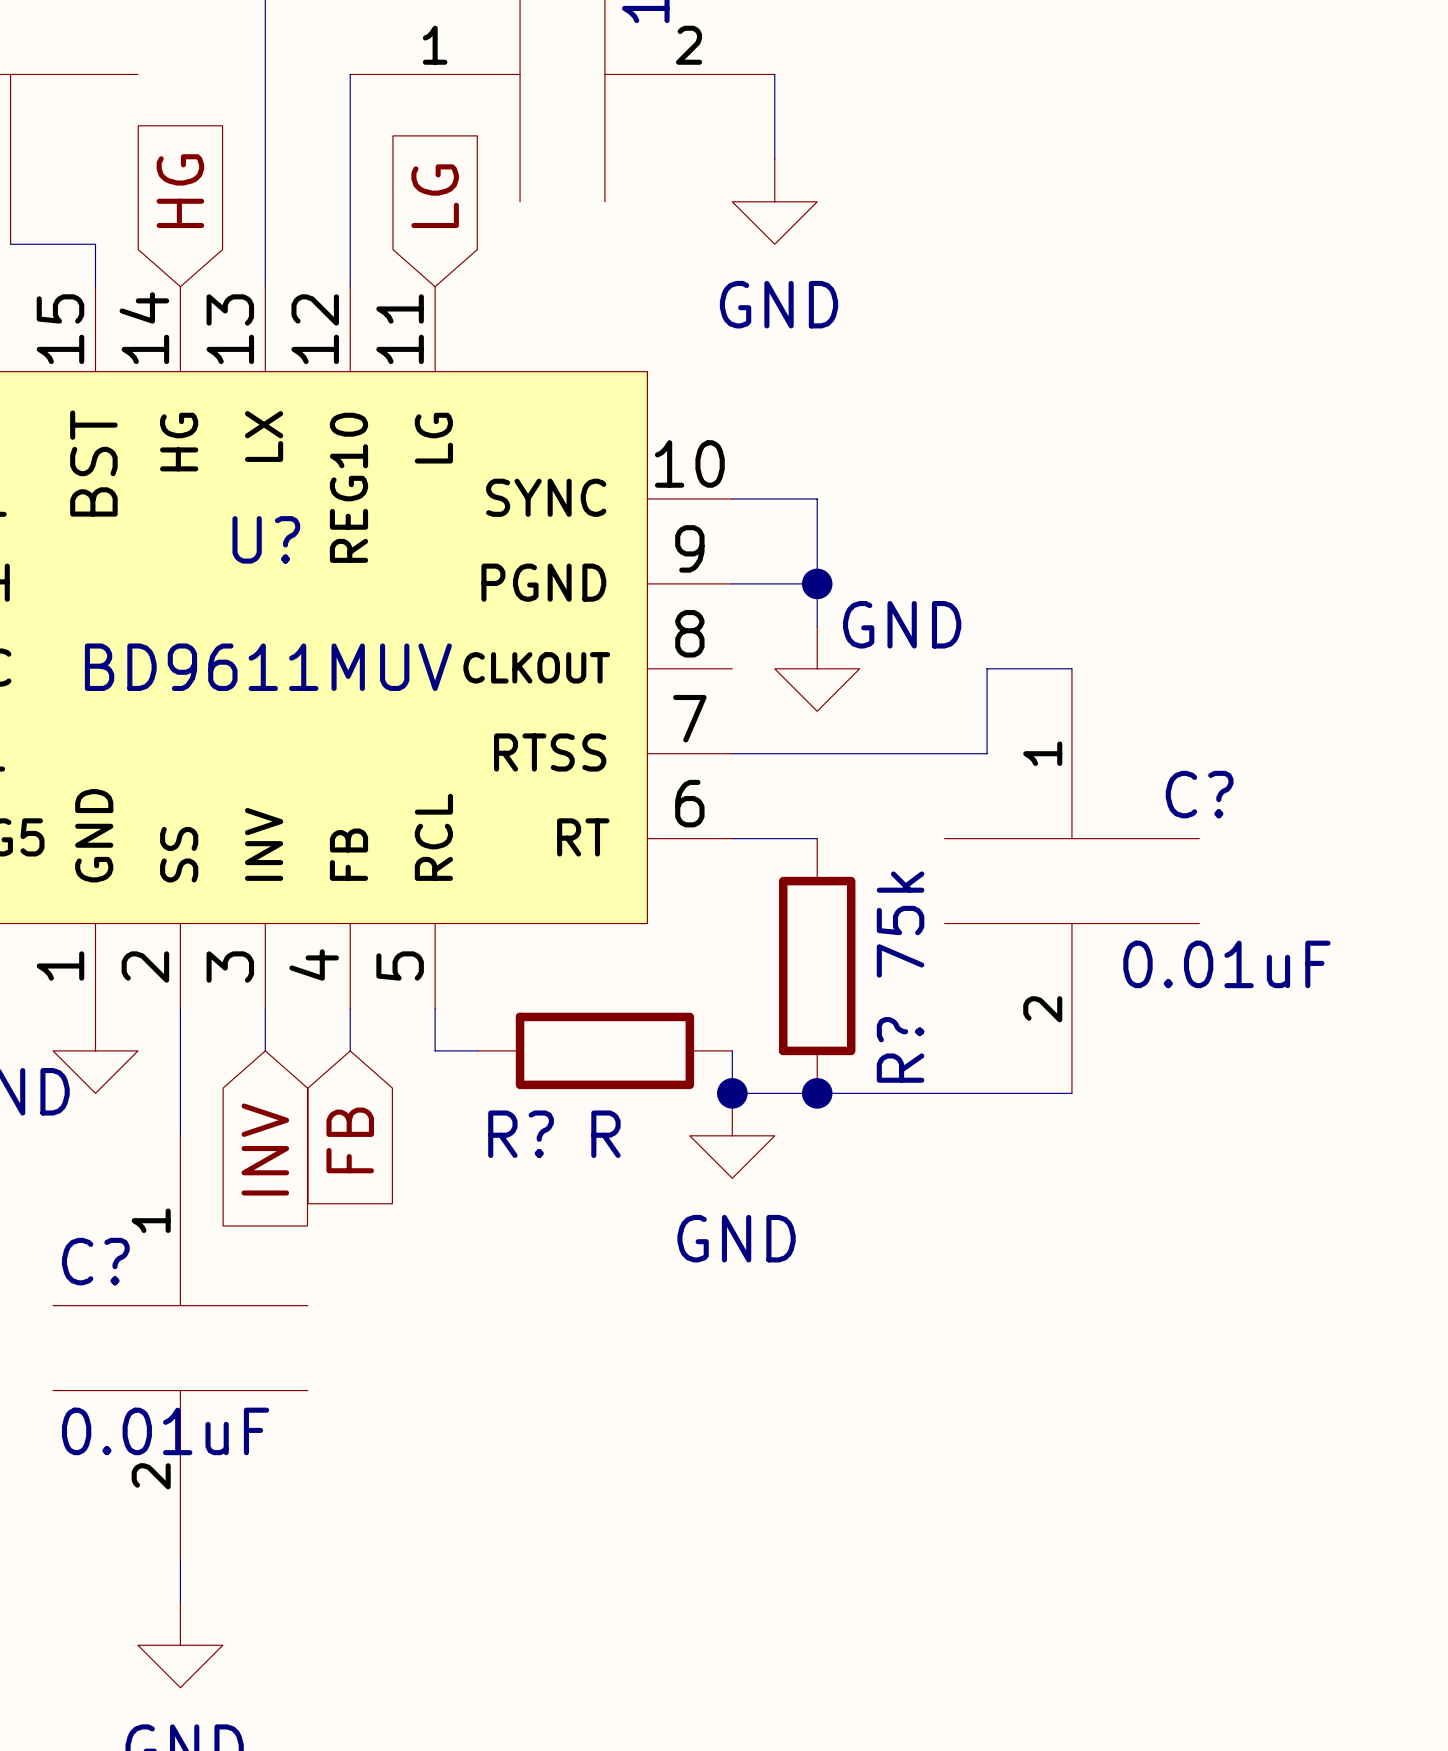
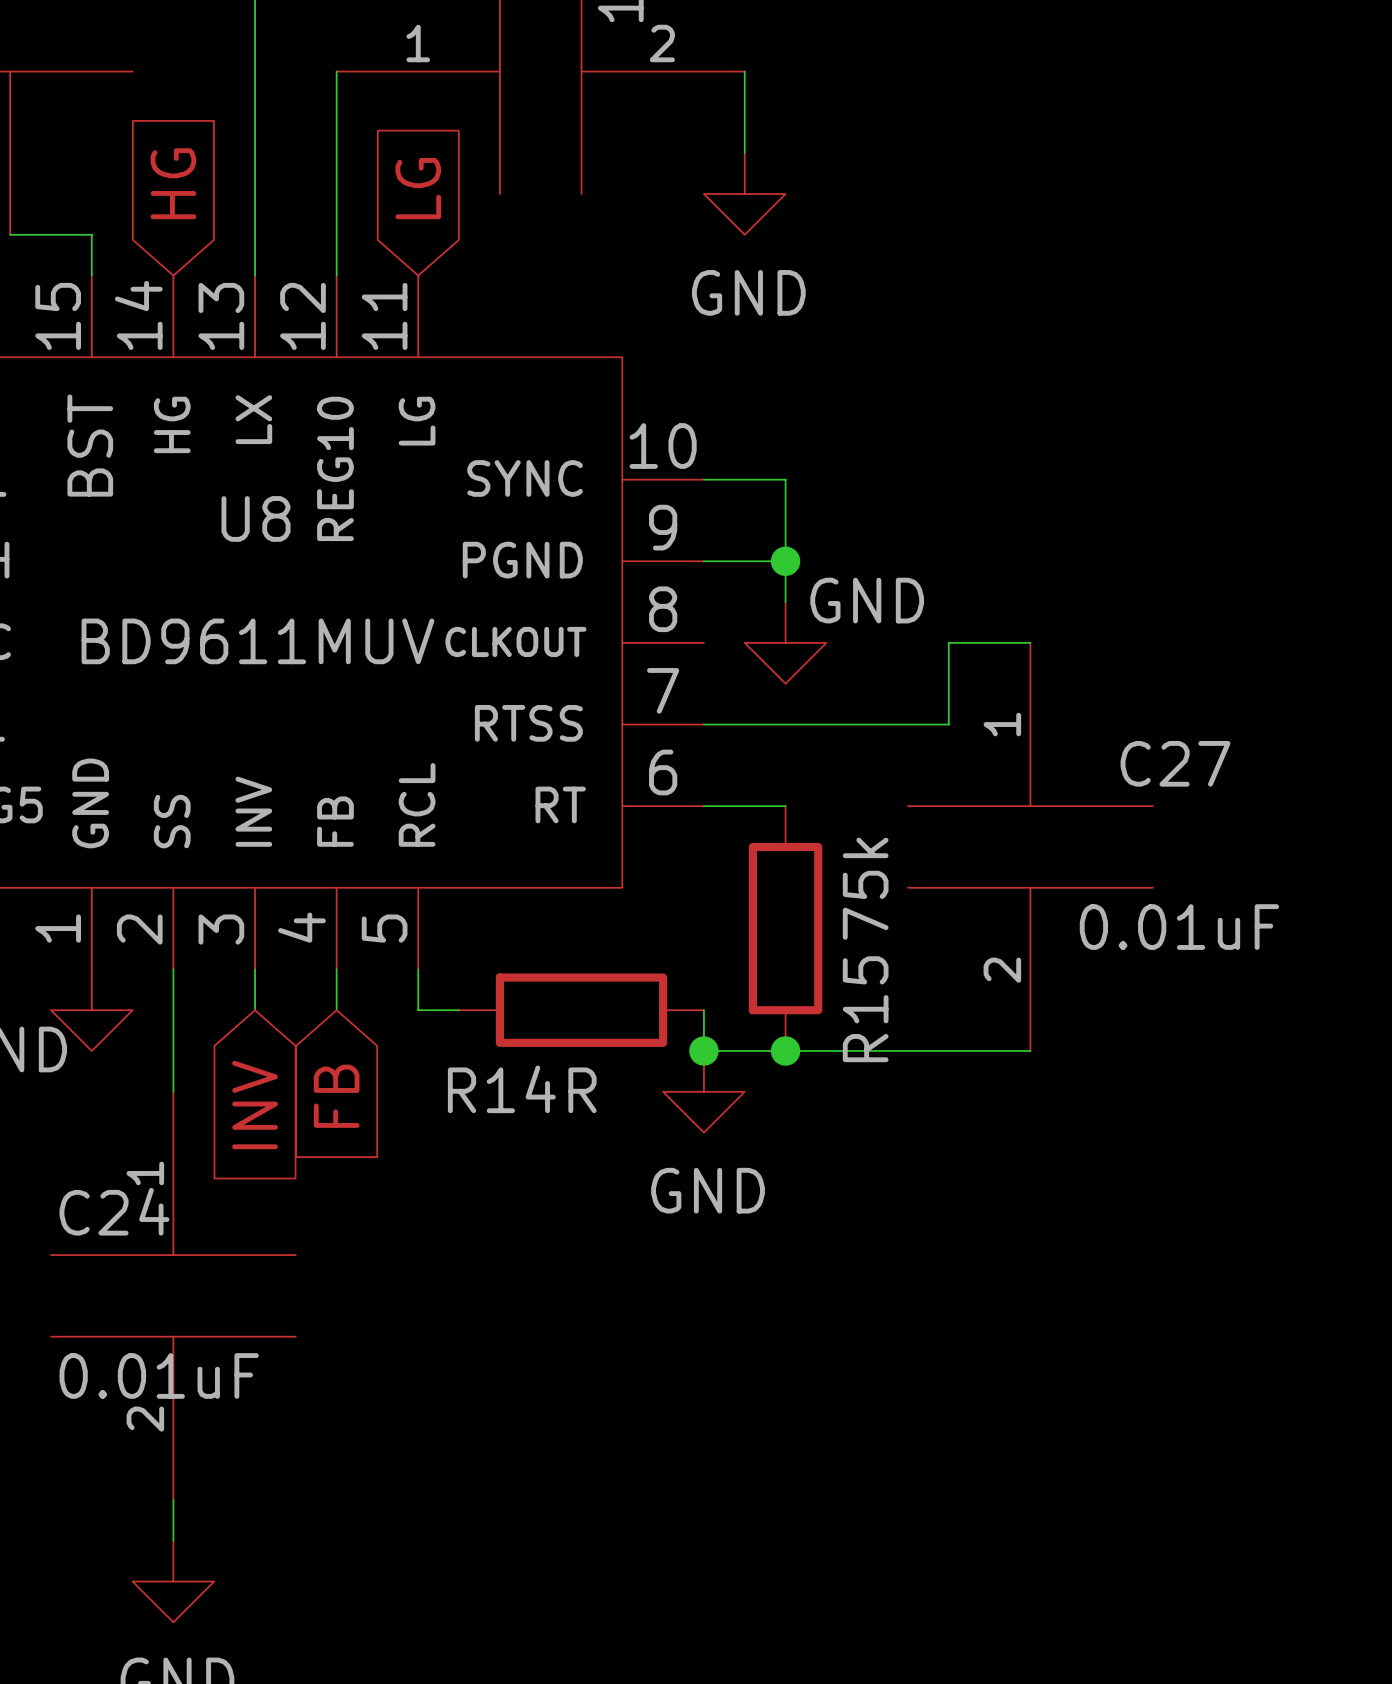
U? name: U? (266, 539) -> U8 (256, 518)
C? name: C? (1199, 794) -> C27 (1175, 763)
R? name: R? (900, 1049) -> R15 (865, 1009)
R? name: R? (521, 1134) -> R14 (501, 1089)
C? name: C? (95, 1261) -> C24 (114, 1211)

